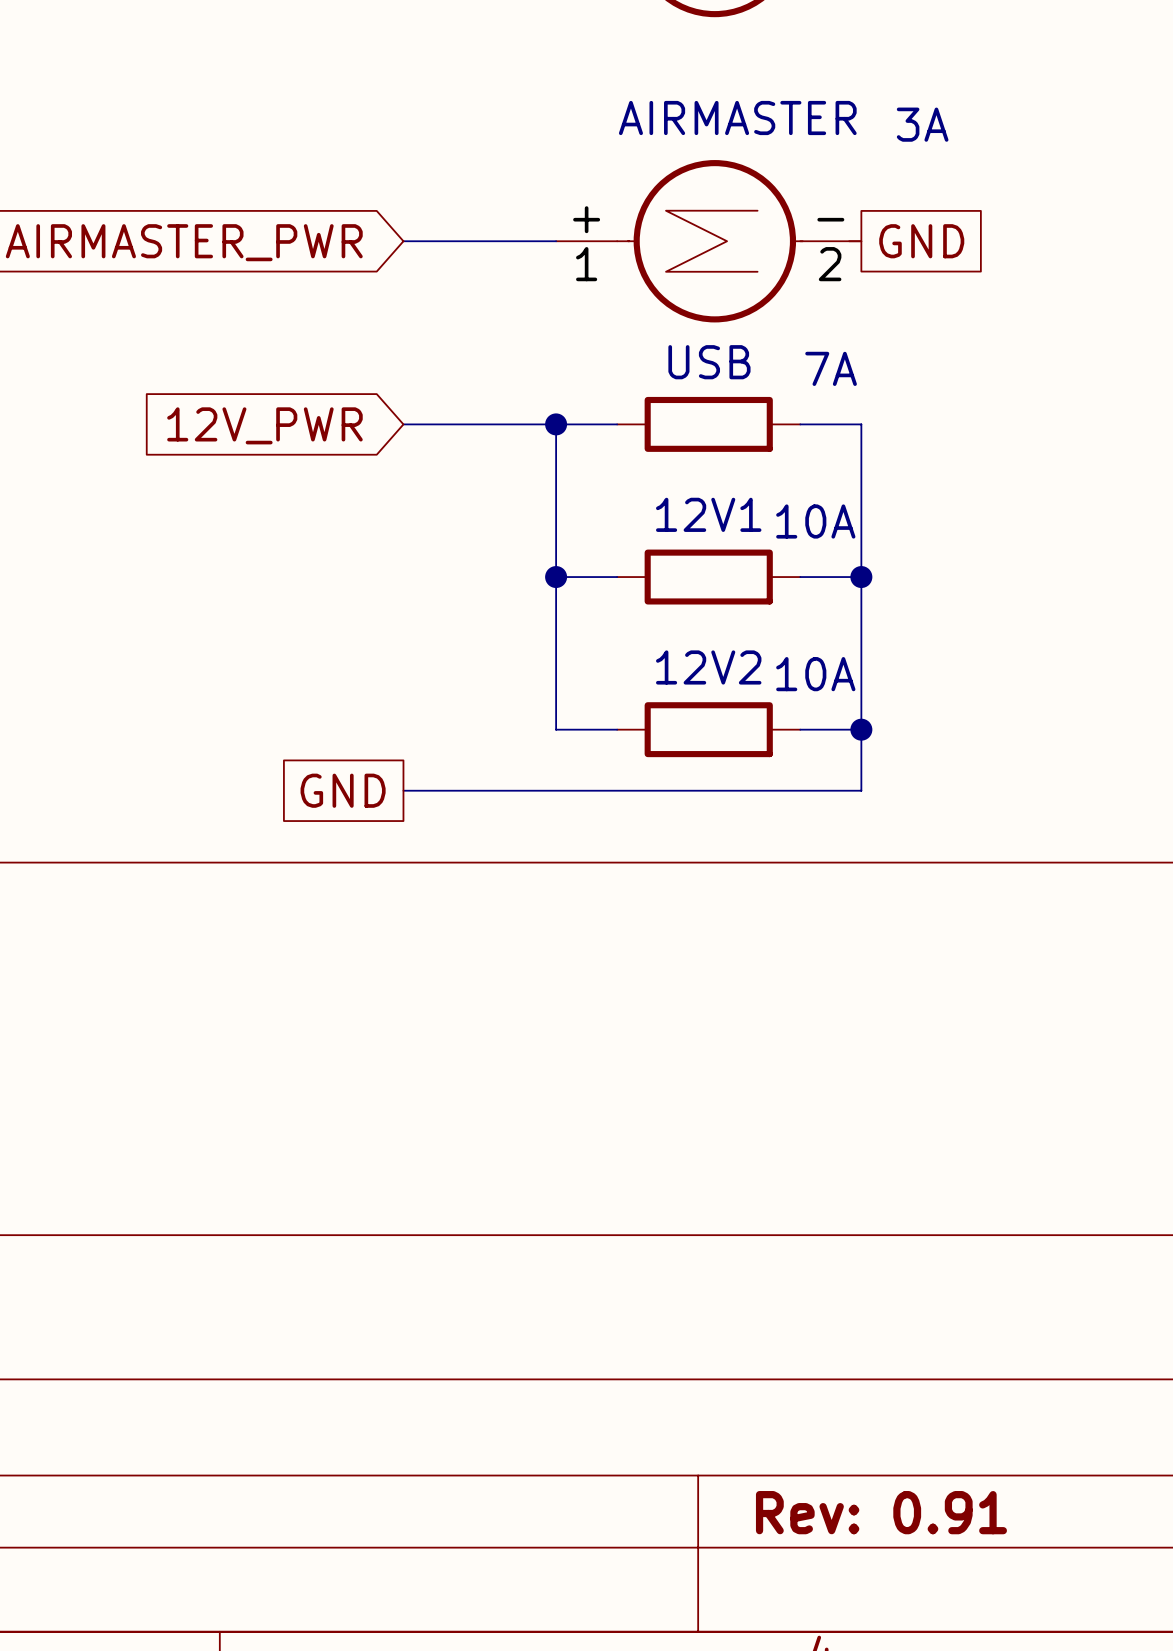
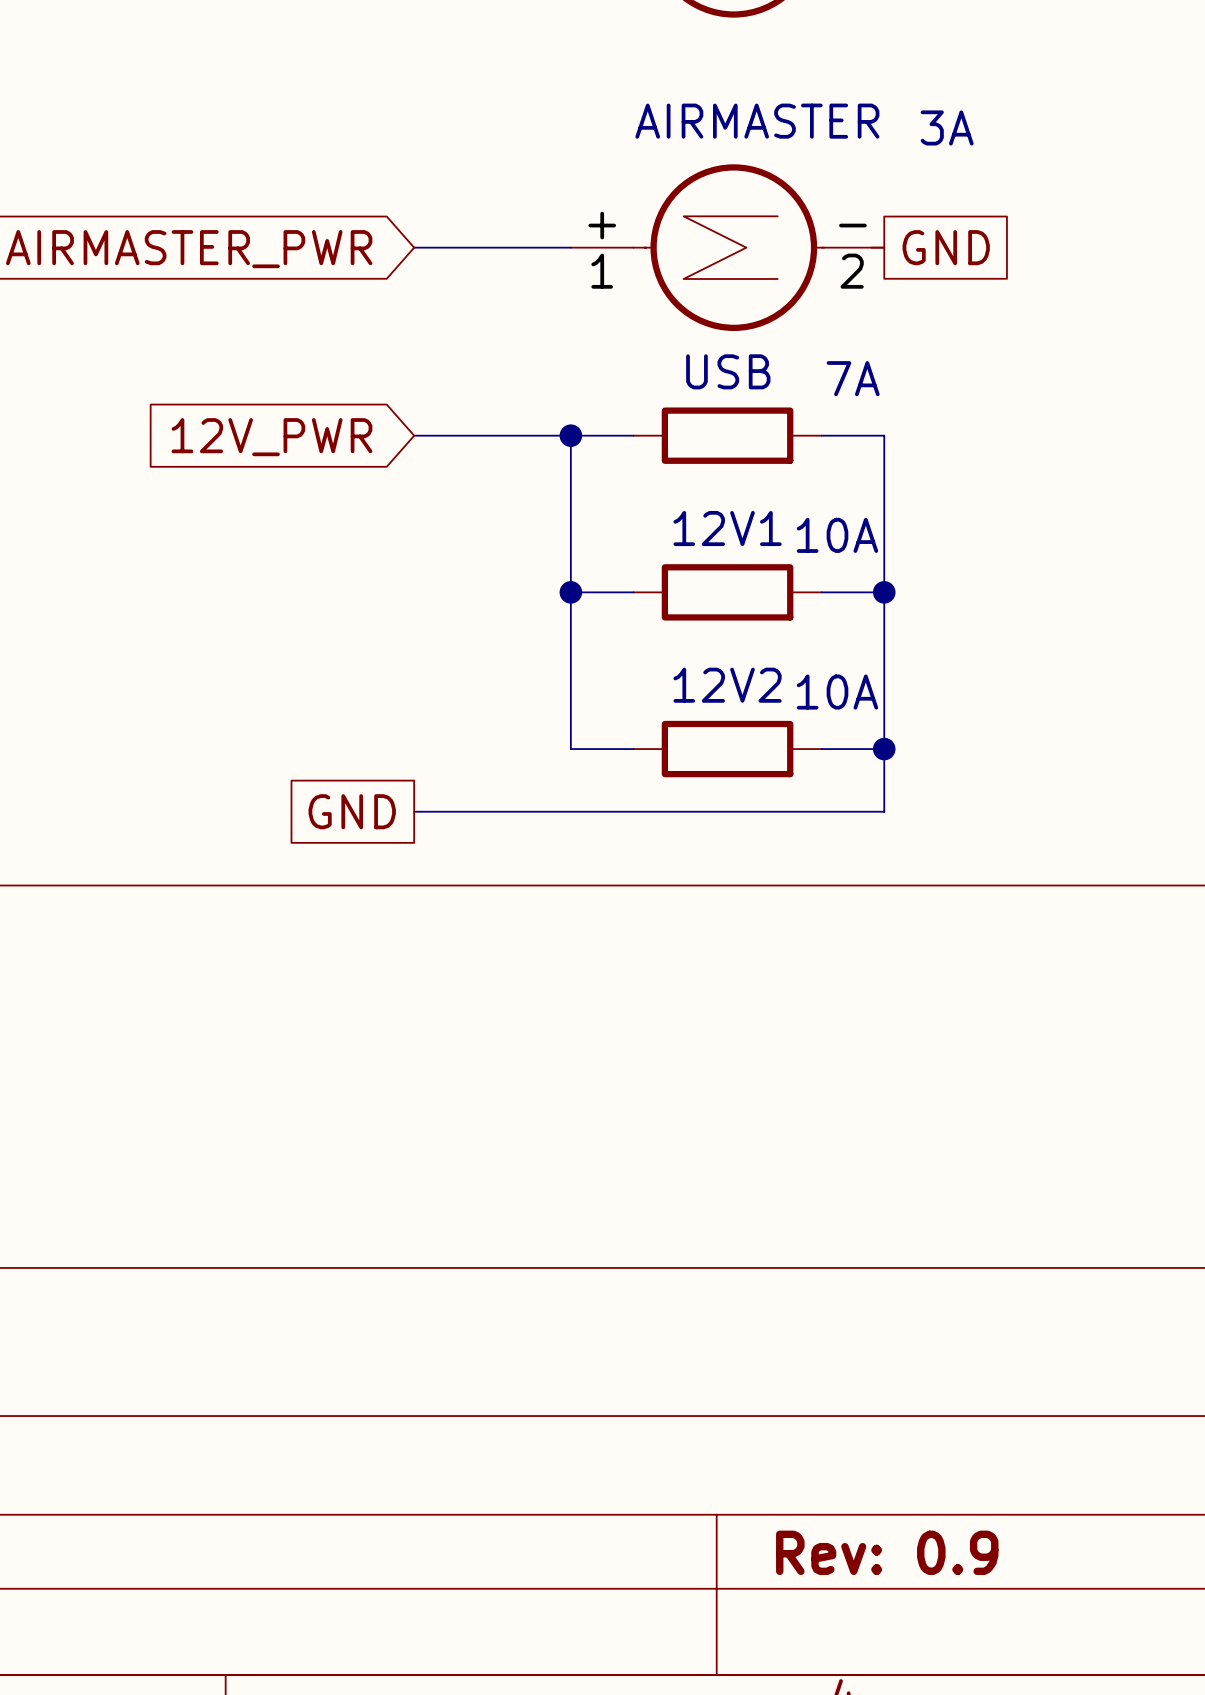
title block: Rev: 0.91 (881, 1512) -> Rev: 0.9 (887, 1552)

